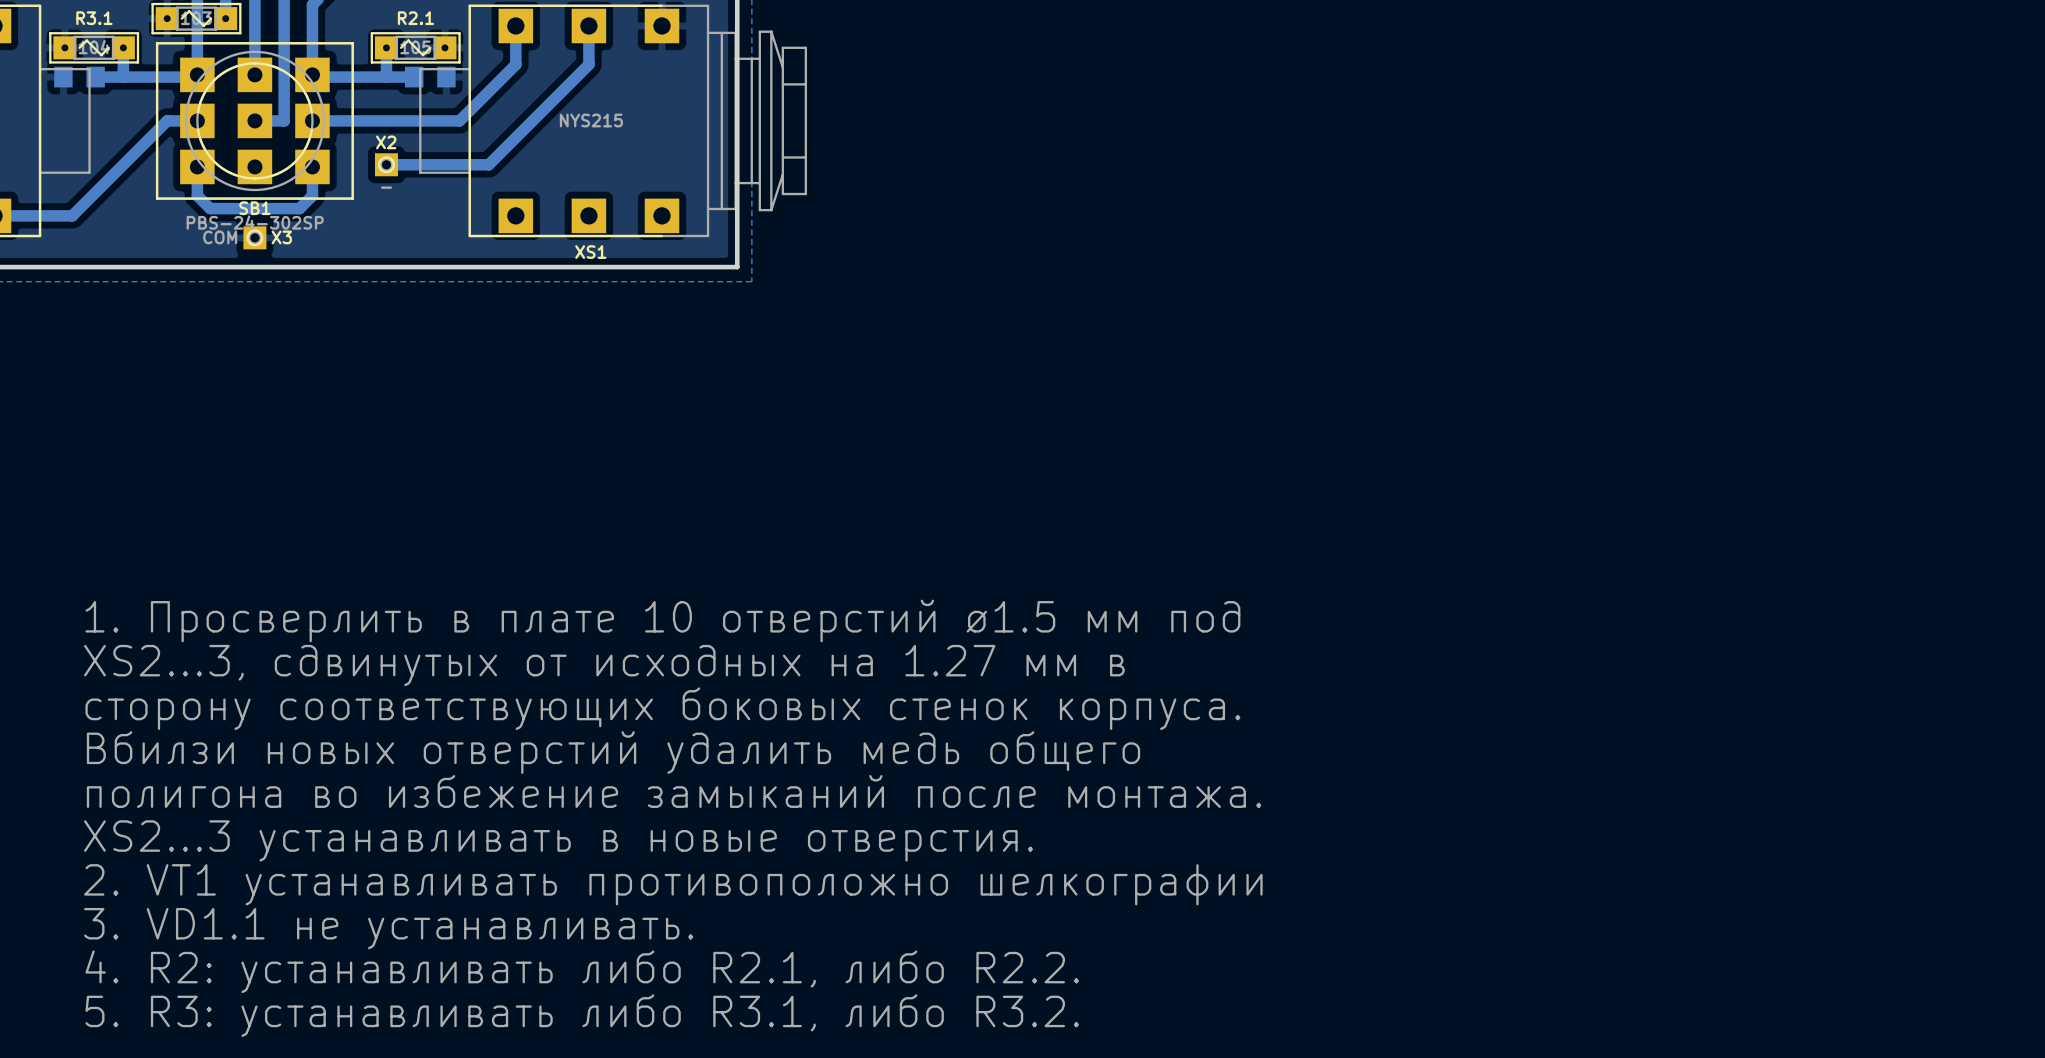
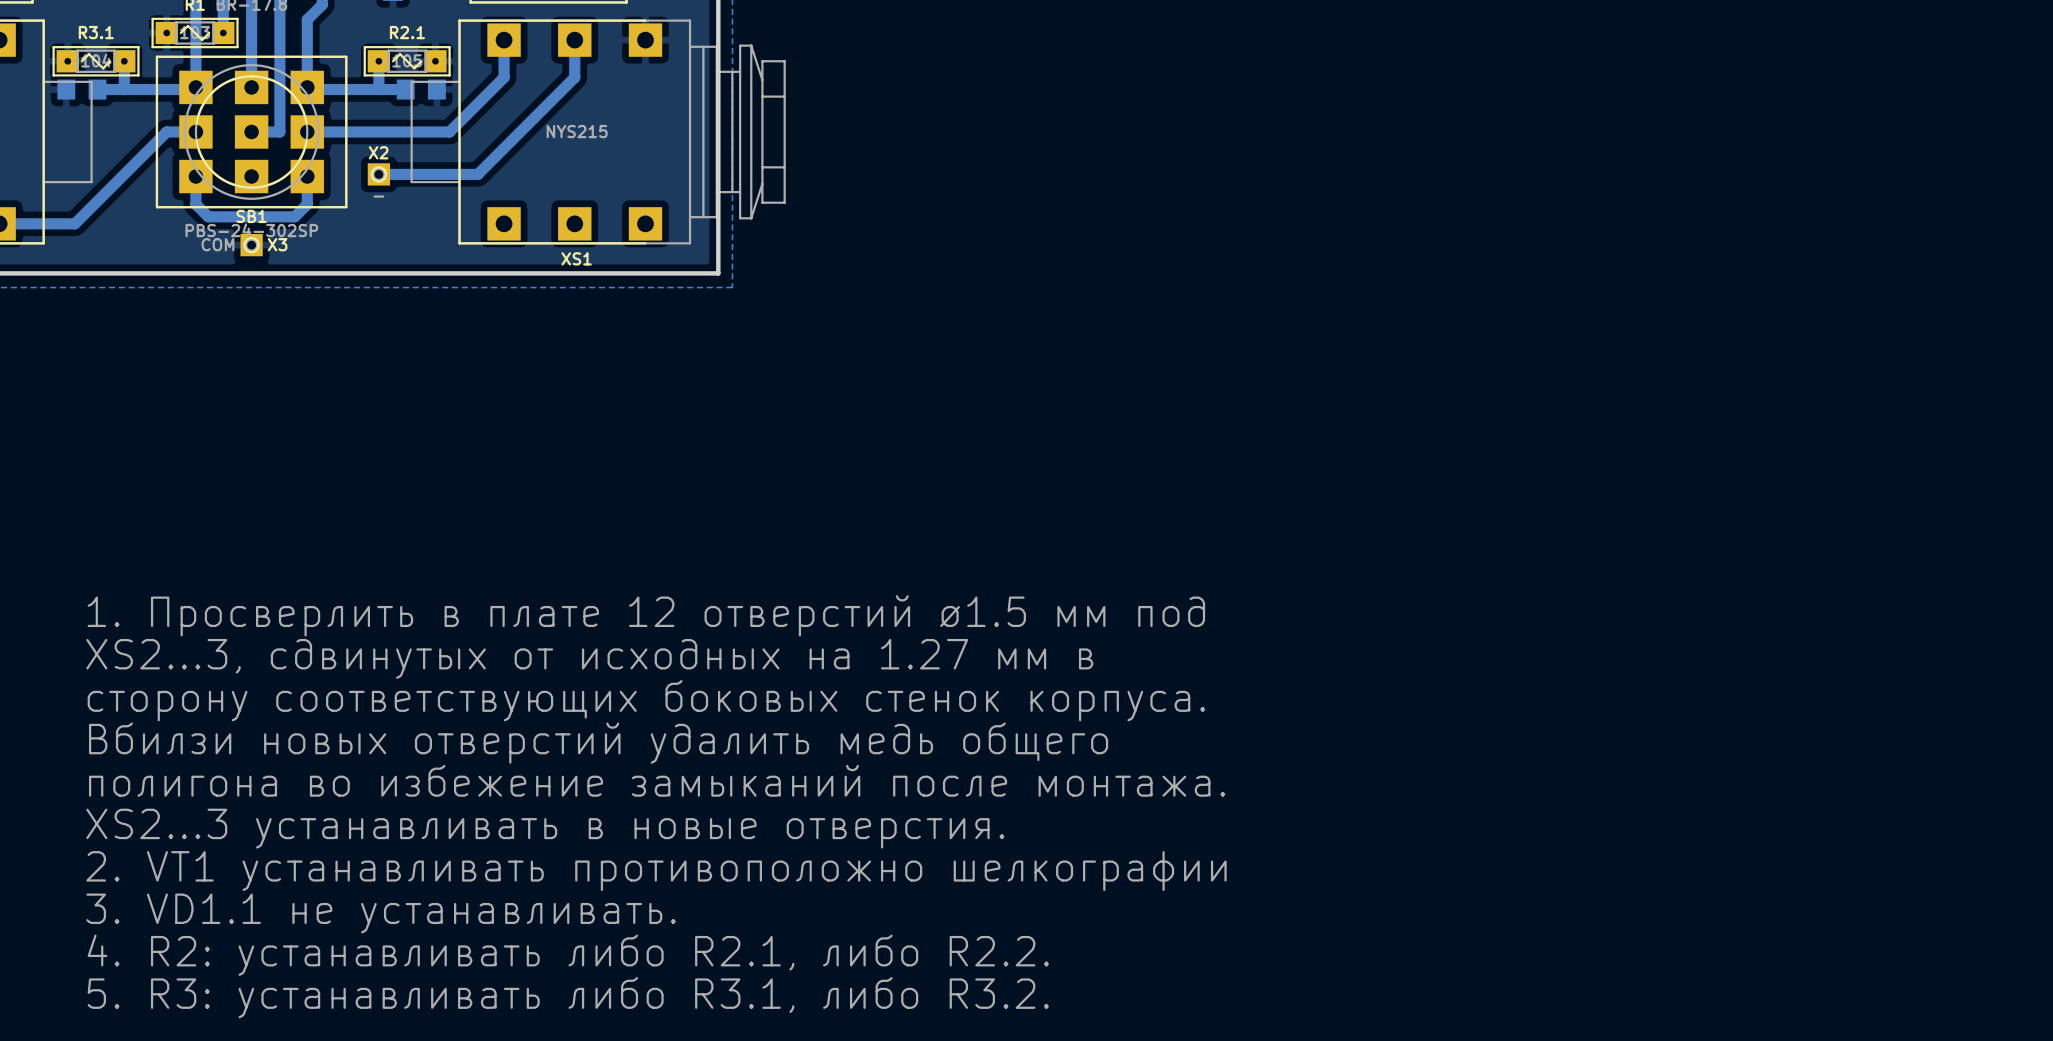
text: 1. Просверлить в плате 10 отверстий ø1.5 мм под (662, 620) -> 1. Просверлить в плате 12 отверстий ø1.5 мм под (646, 615)

